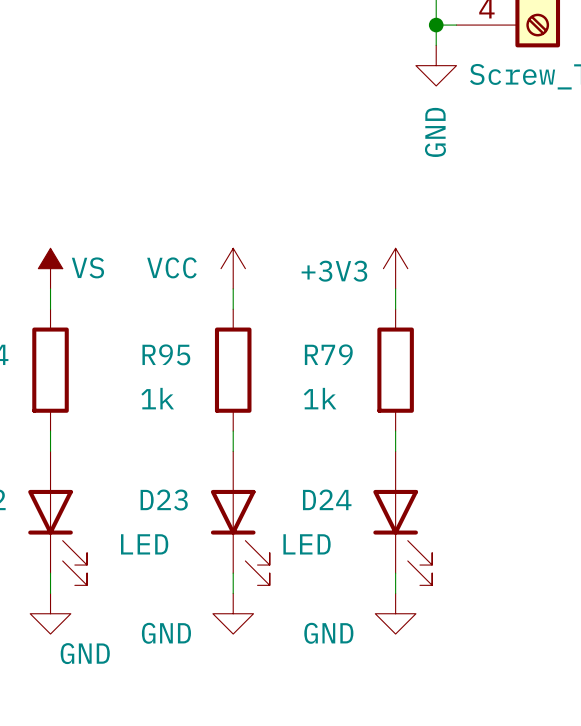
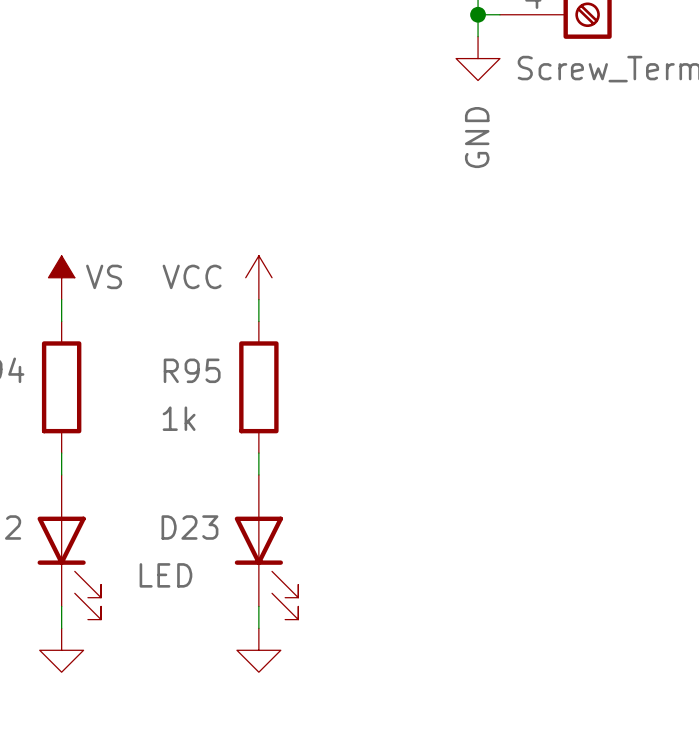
power symbol: +3V3 (395, 268) -> none
wire: (395, 288) (395, 309) -> none
R79: 1k (395, 370) -> none
wire: (395, 431) (395, 451) -> none
D24: LED (402, 518) -> none
wire: (395, 573) (395, 593) -> none
power symbol: GND (395, 613) -> none
power symbol text: GND (166, 633) -> none
power symbol text: GND (85, 653) -> none

